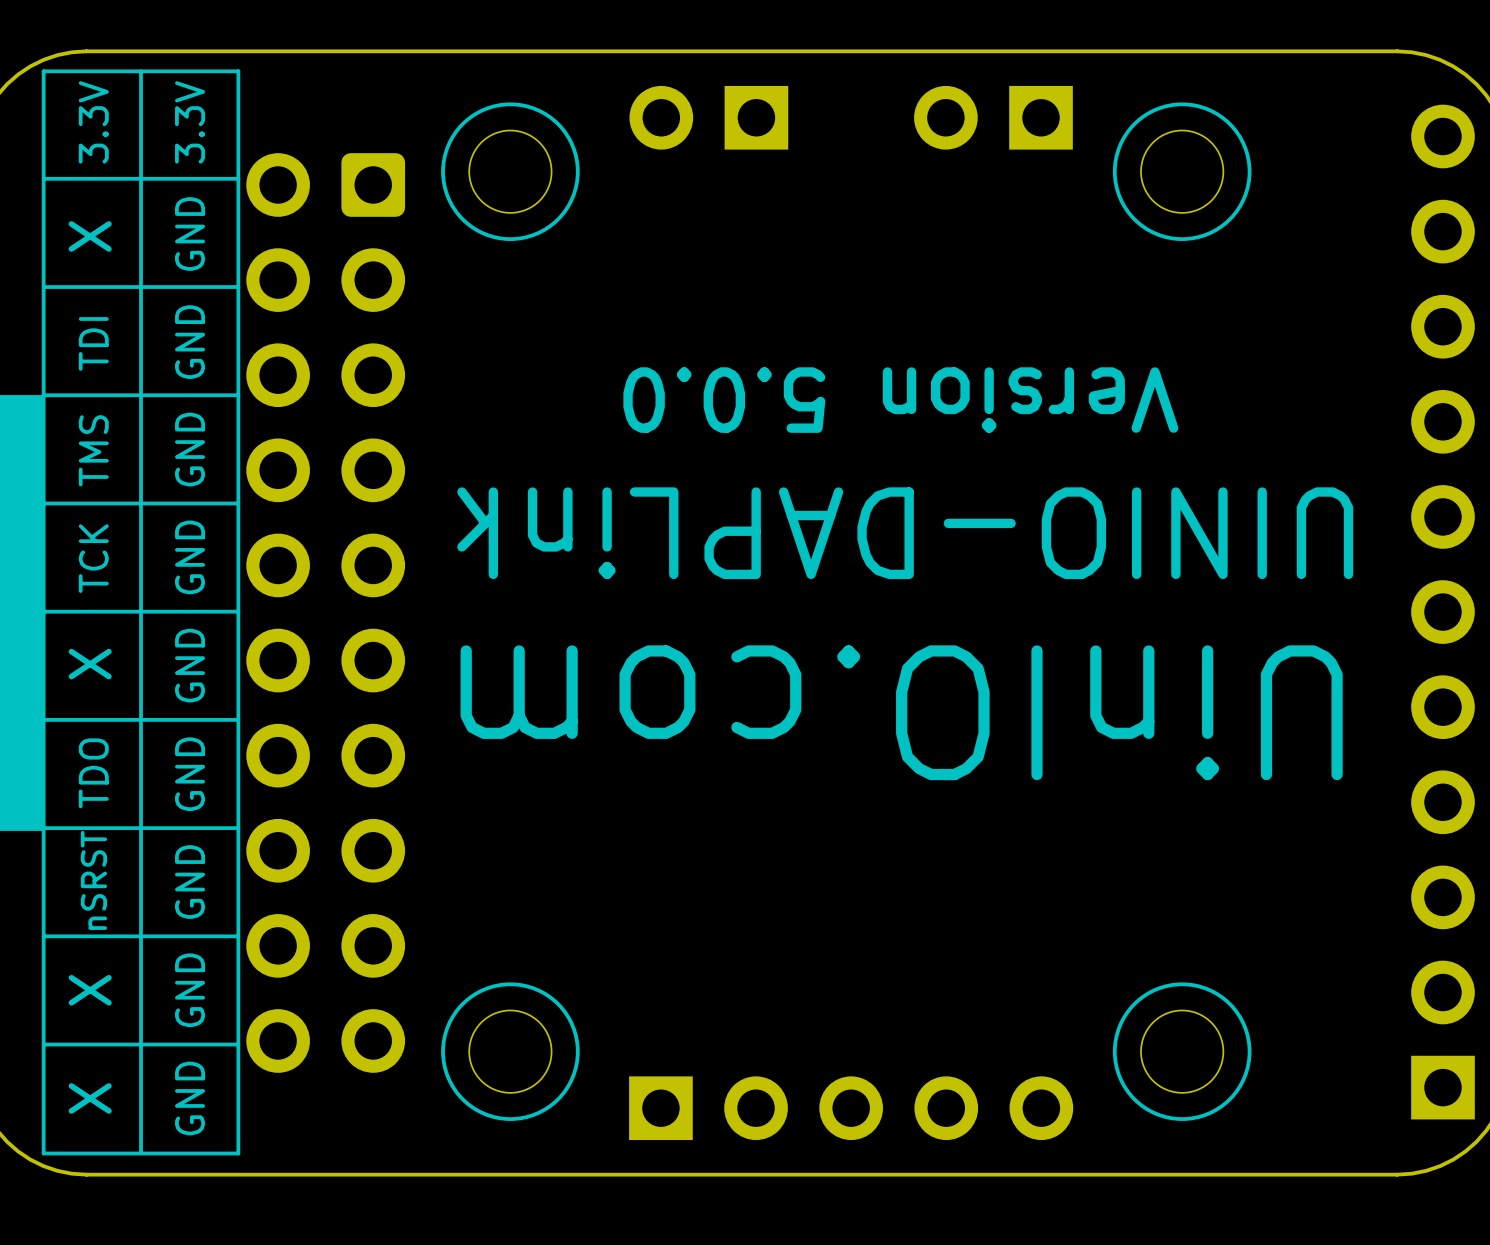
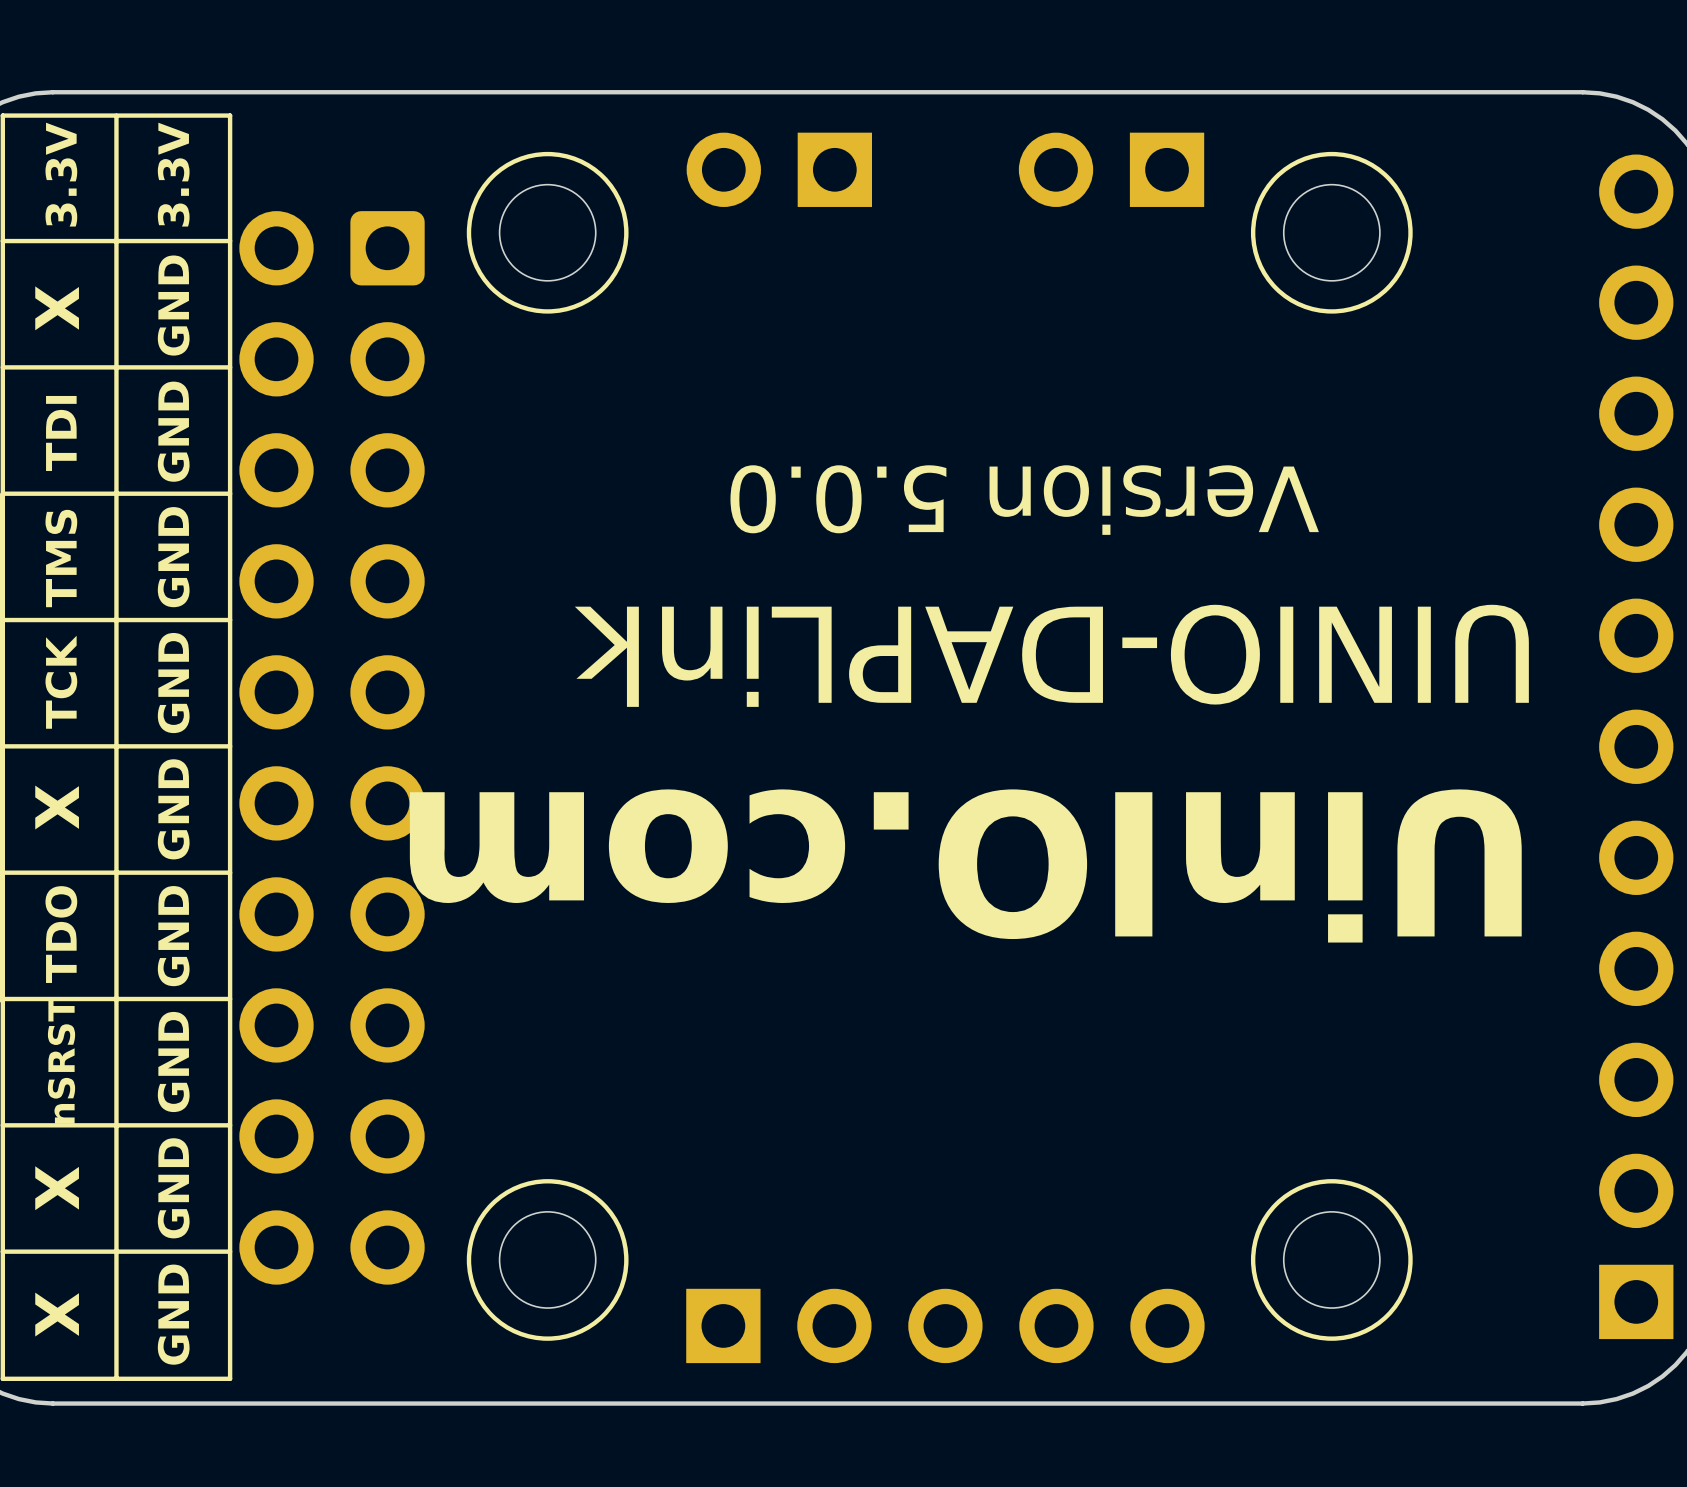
text position: Version 5.0.0 (900, 400) -> Version 5.0.0 (1024, 500)
text position: UINIO-DAPLink (905, 533) -> UINIO-DAPLink (1051, 655)
text position: UinIO.com (901, 712) -> UinIO.com (965, 865)

